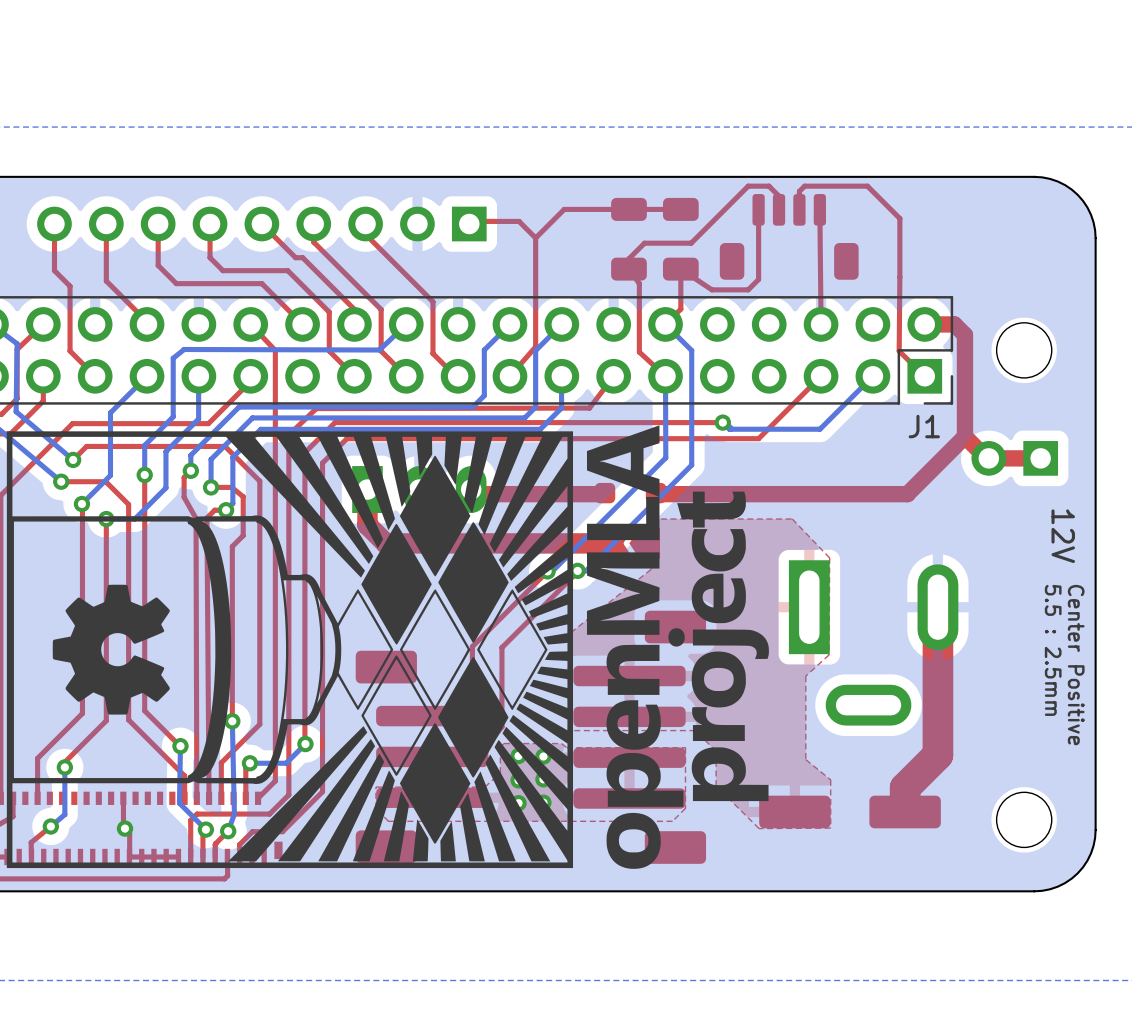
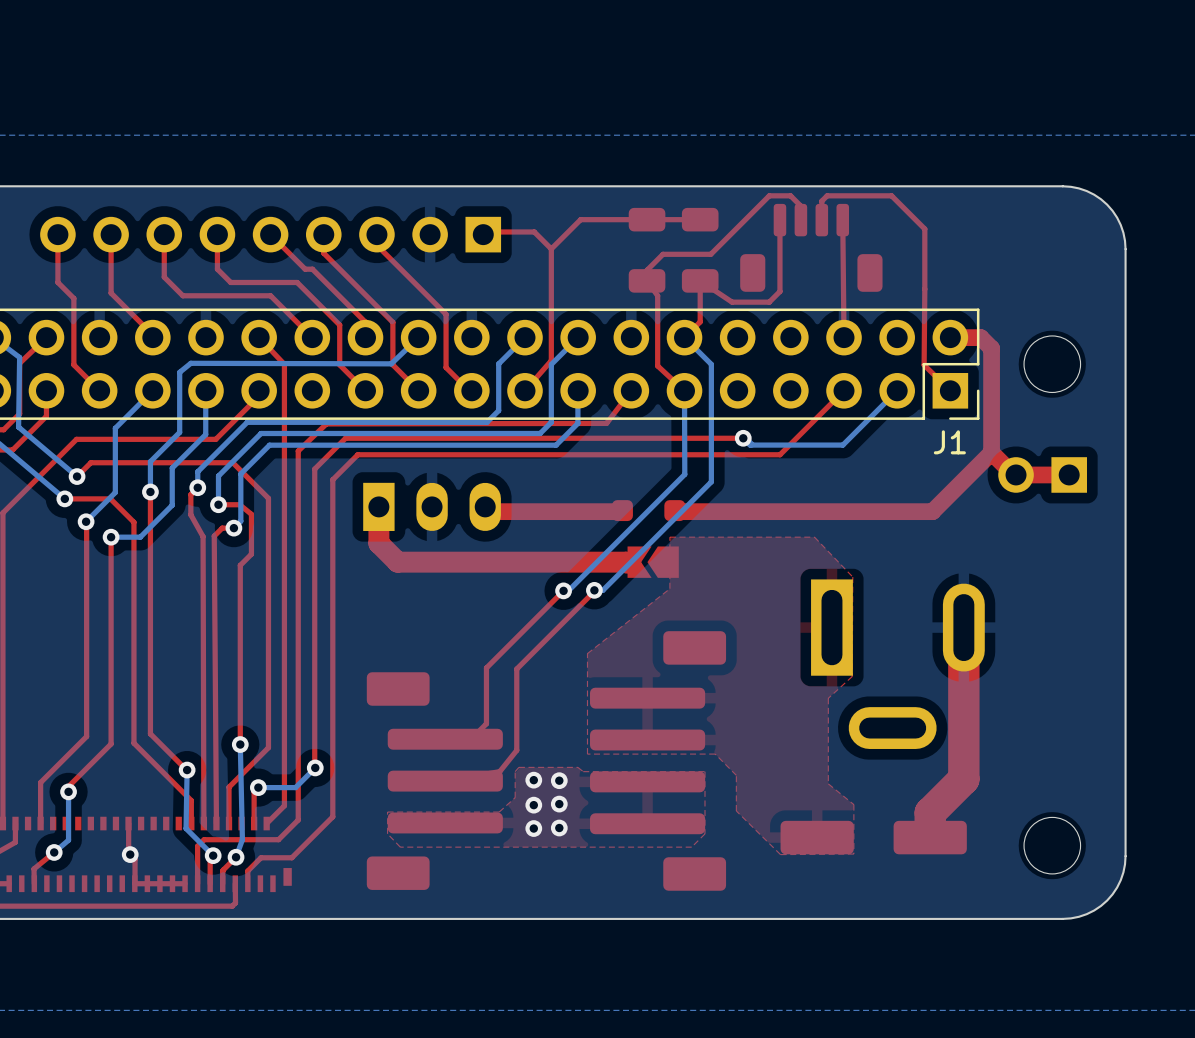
drawing: [6, 425, 769, 869] -> none
text: 12V (1063, 536) -> none
text: 5.5 : 2.5mm (1053, 650) -> none
text: Center Positive (1076, 665) -> none

